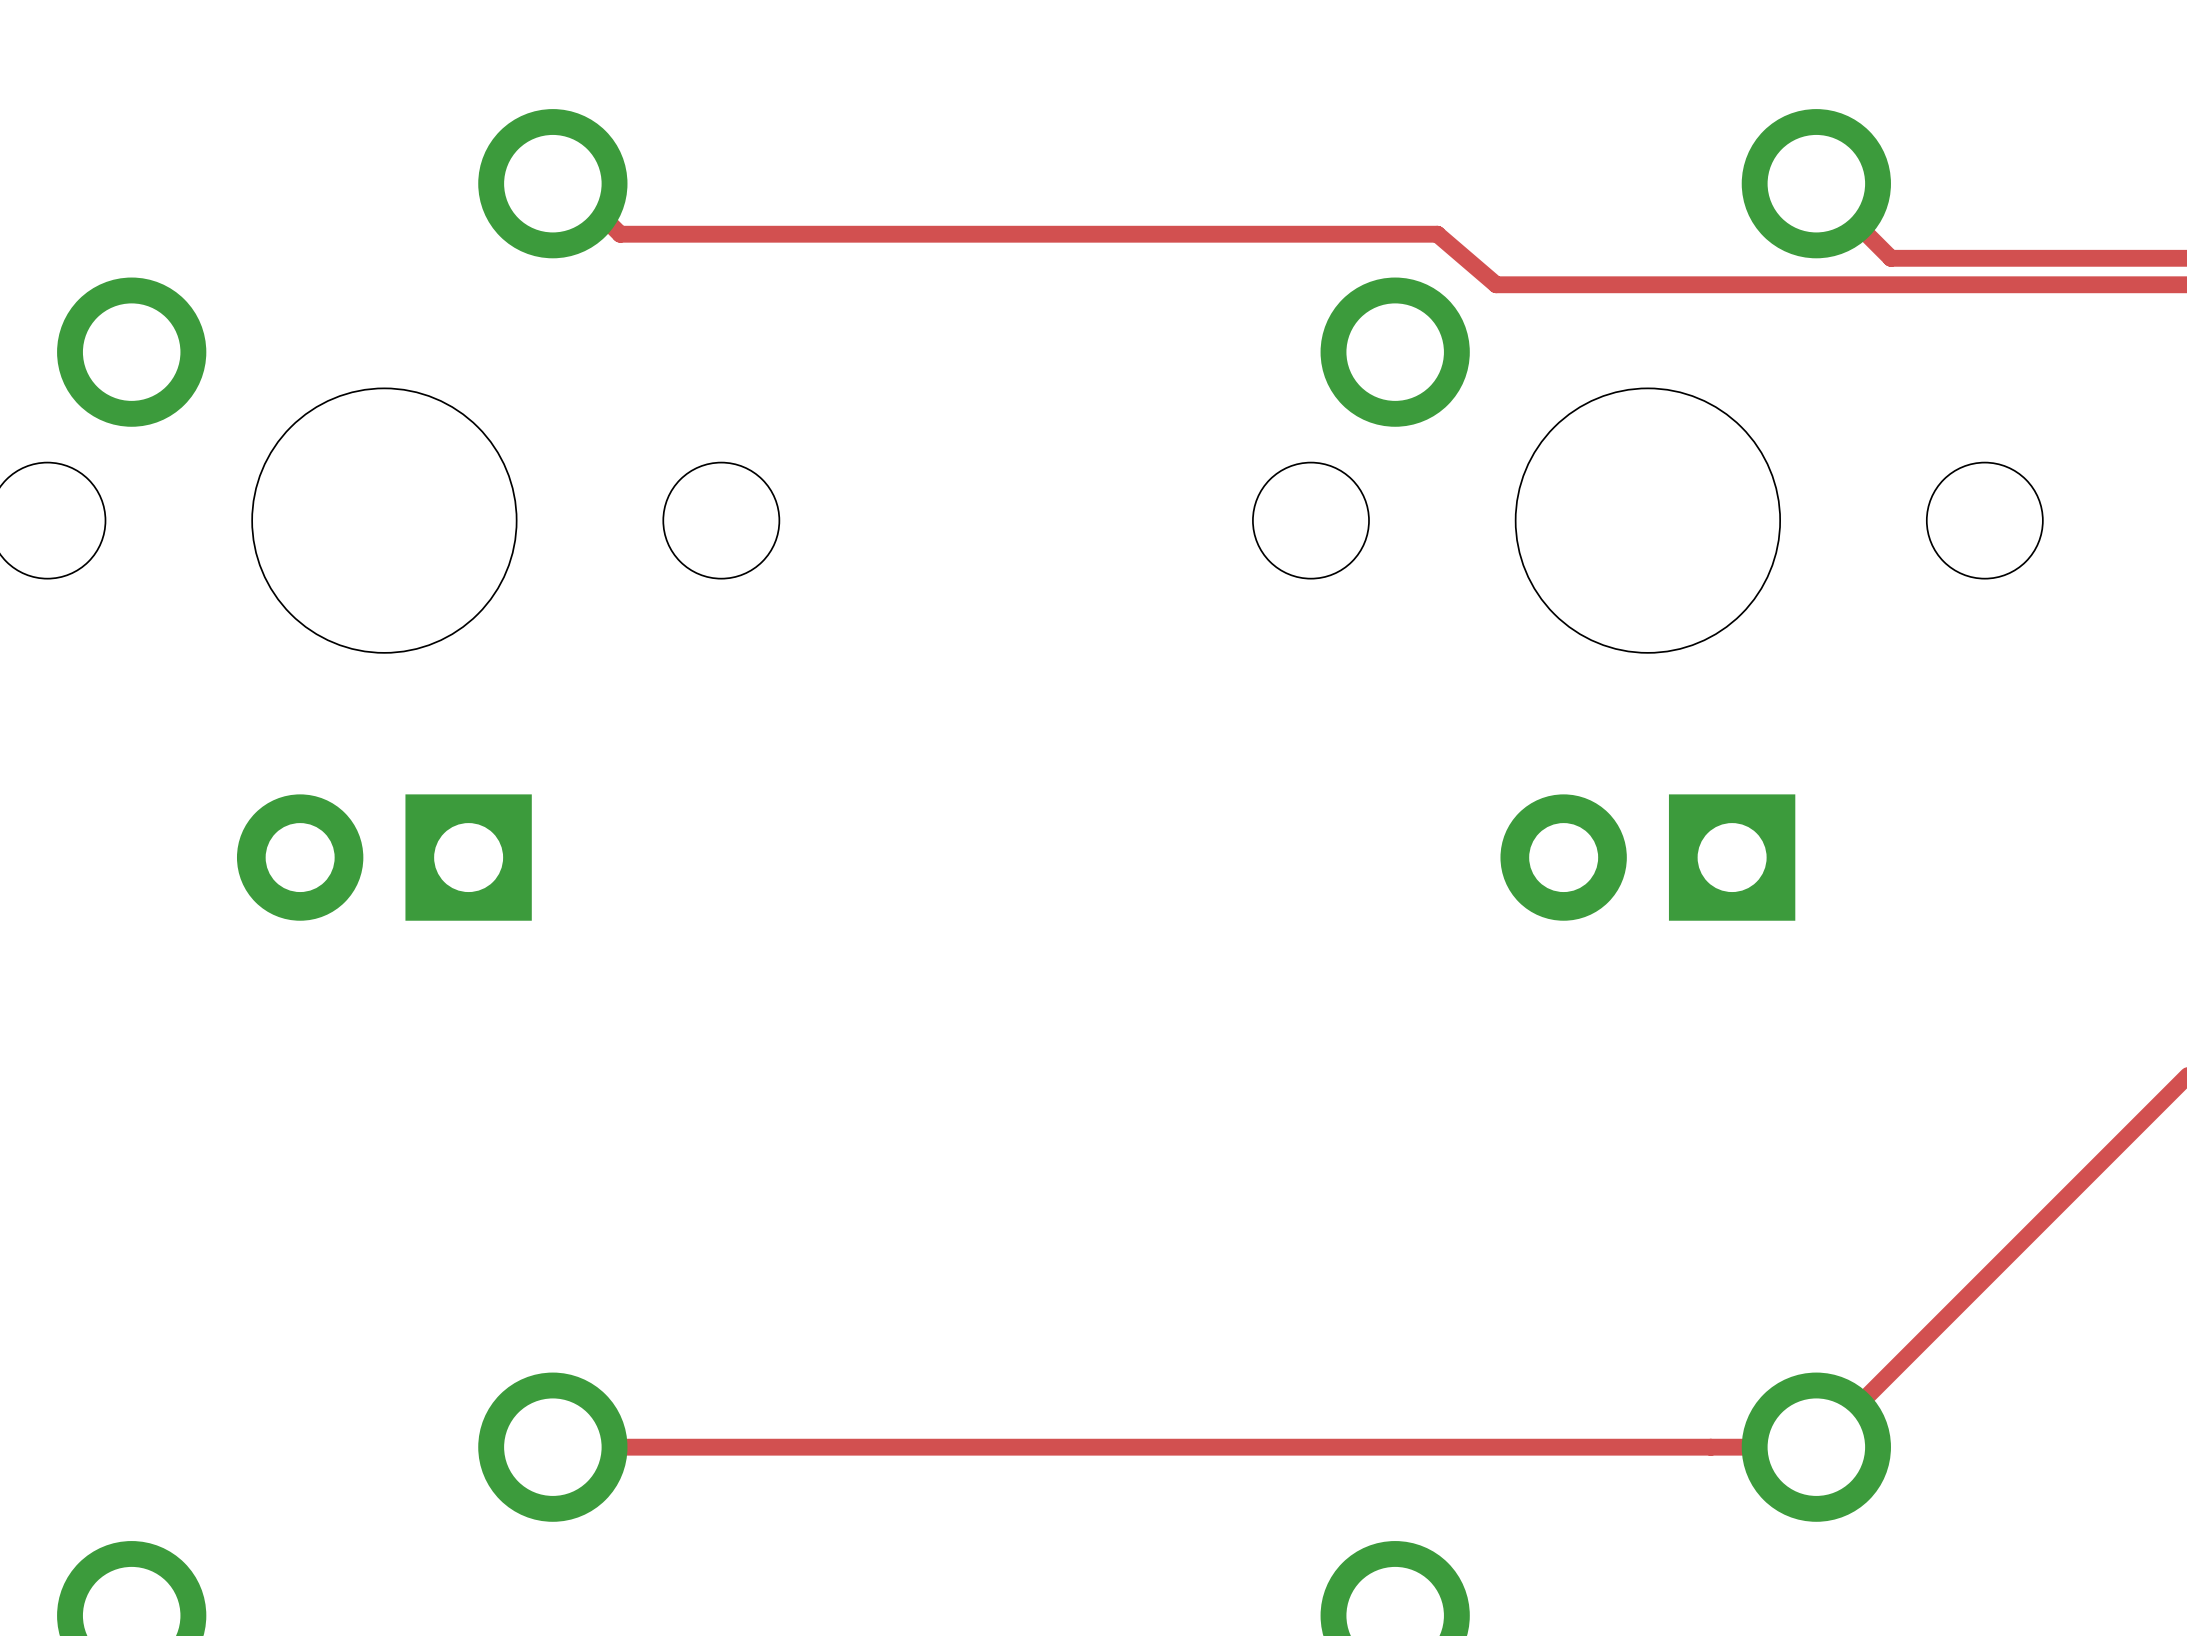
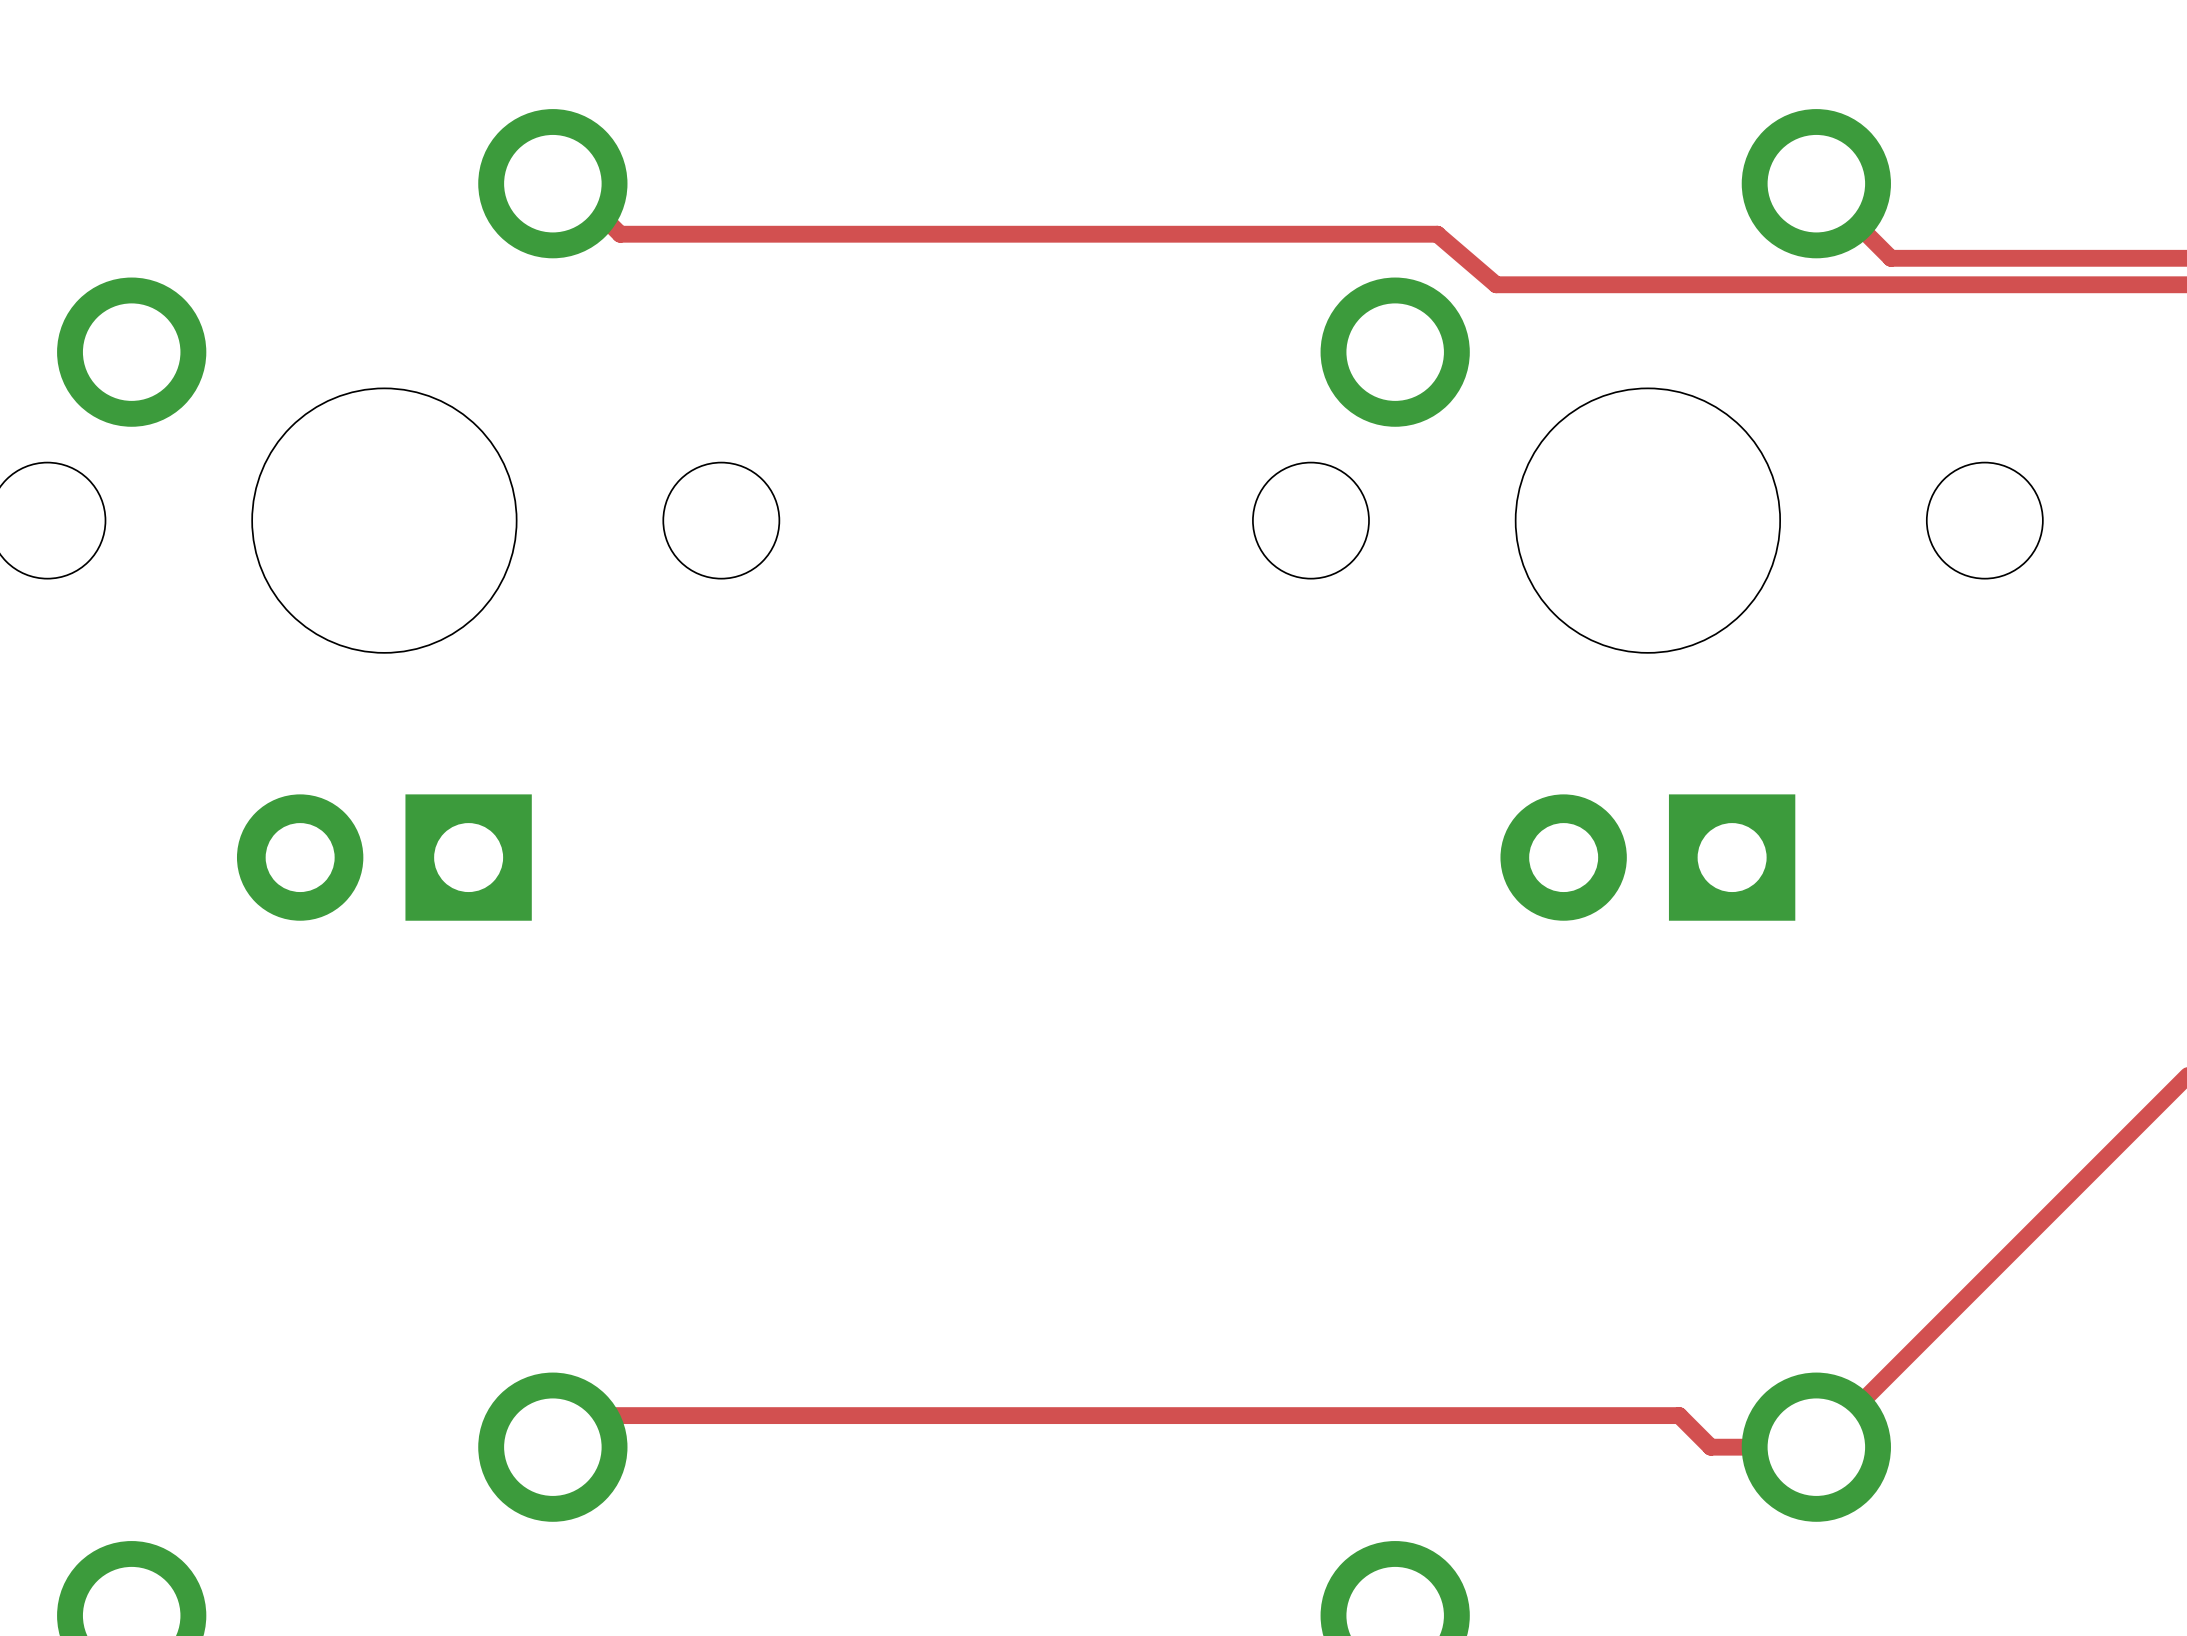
track: (552, 1447) (1710, 1447) -> (552, 1447) (584, 1415) (1679, 1415) (1710, 1447)

